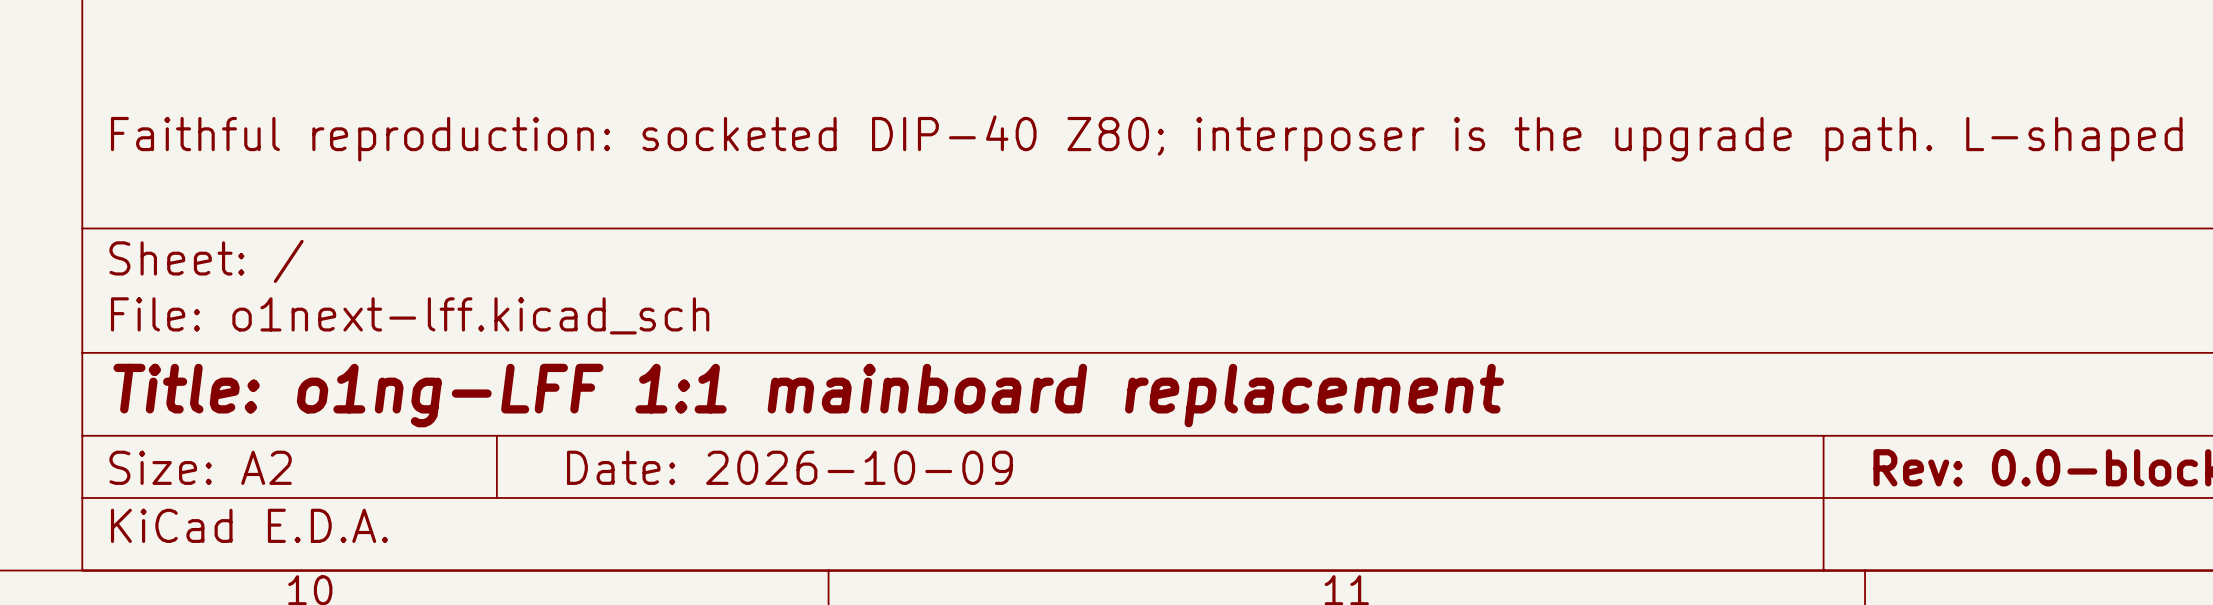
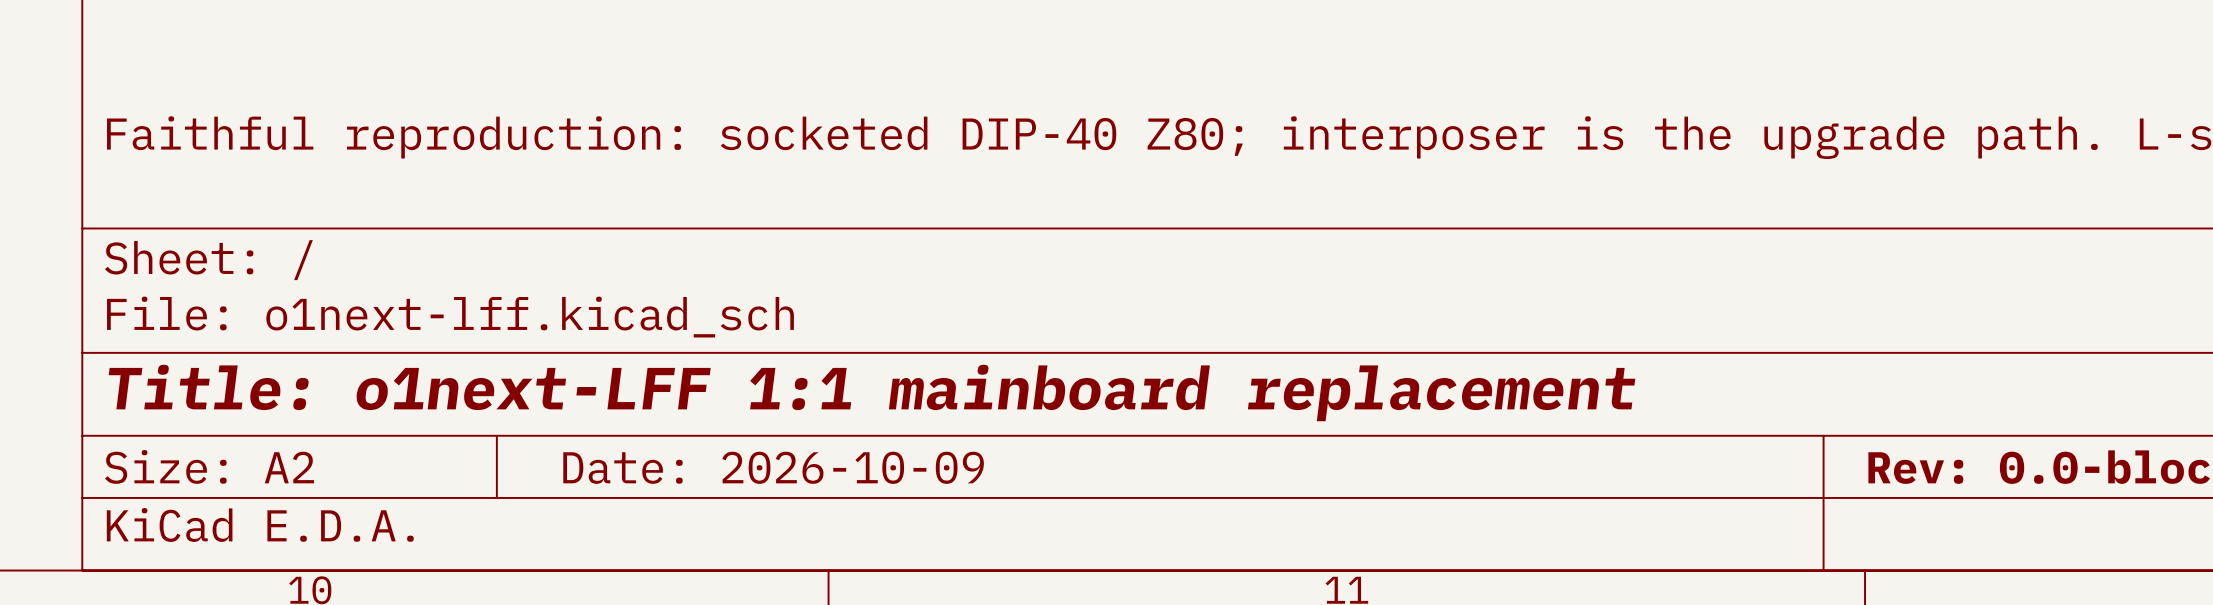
title block: Title: o1ng-LFF 1:1 mainboard replacement (808, 395) -> Title: o1next-LFF 1:1 mainboard replacement (871, 393)

